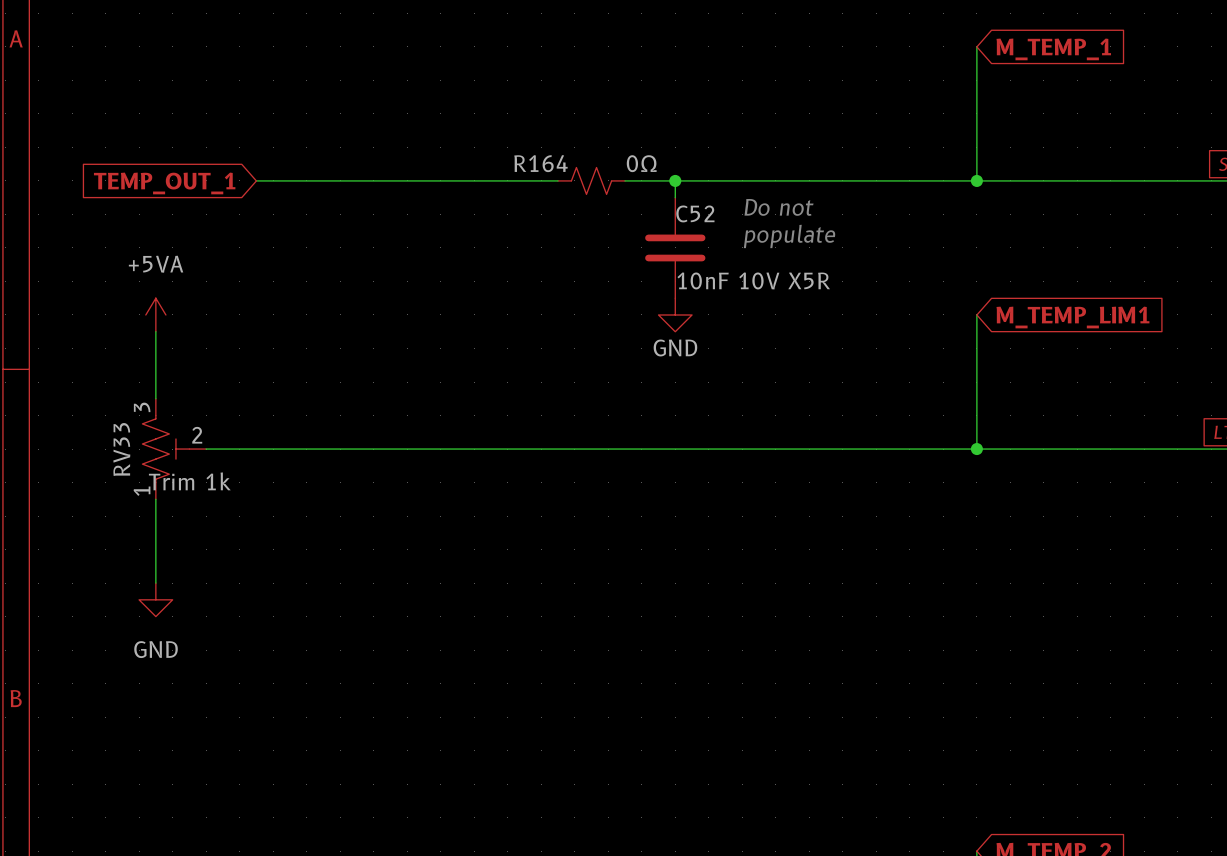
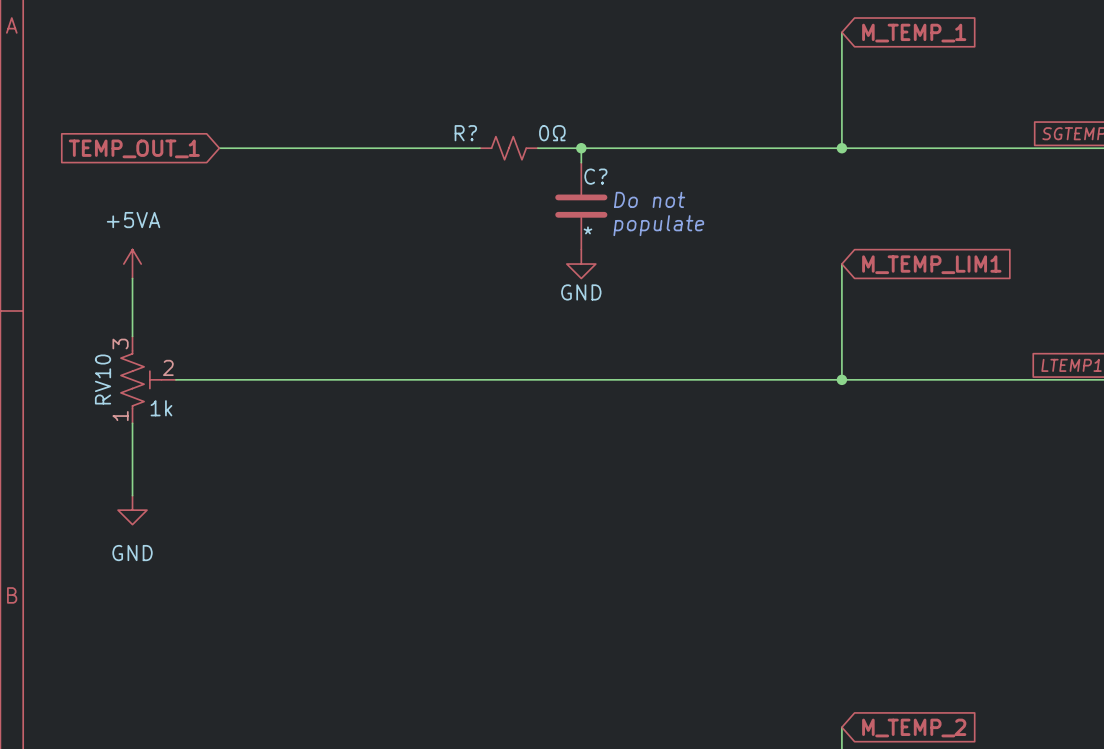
R164 name: R164 (540, 163) -> R? (465, 133)
text position: Do not (779, 207) -> Do not (649, 199)
C52 name: C52 (695, 213) -> C? (595, 176)
text position: populate (789, 236) -> populate (658, 225)
C52 value: 10nF 10V X5R (753, 280) -> * (587, 230)
RV33 name: RV33 (121, 449) -> RV10 (103, 379)
RV33 value: Trim 1k (189, 481) -> 1k (161, 408)

